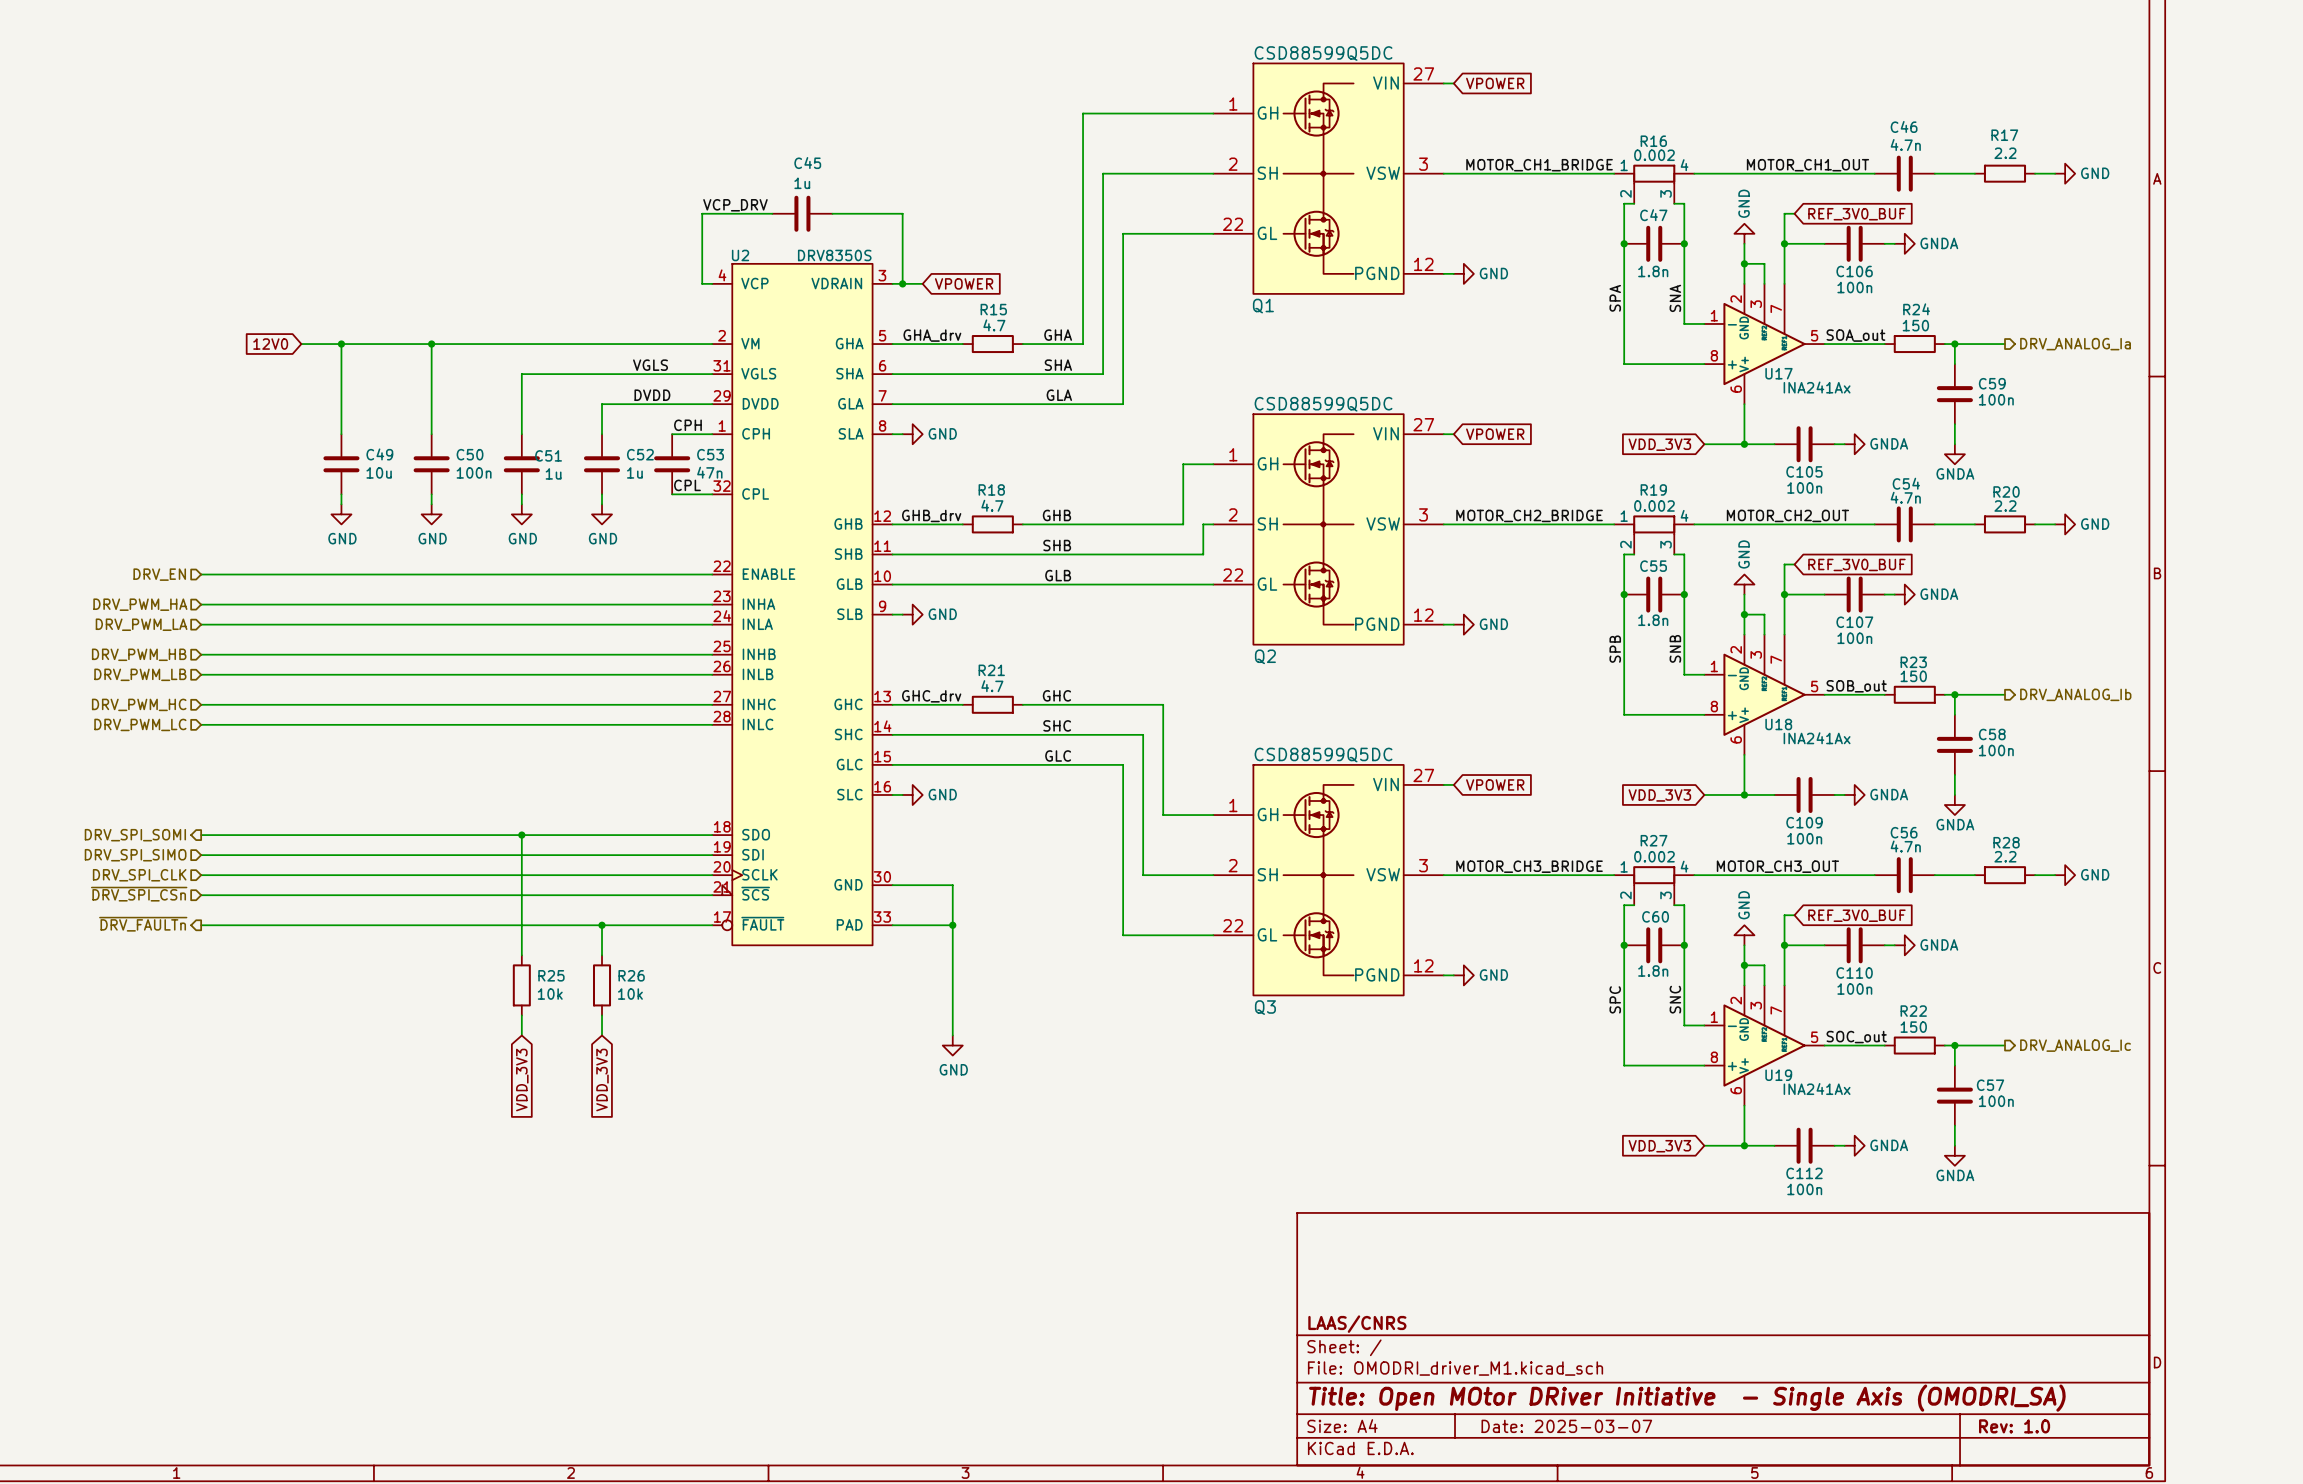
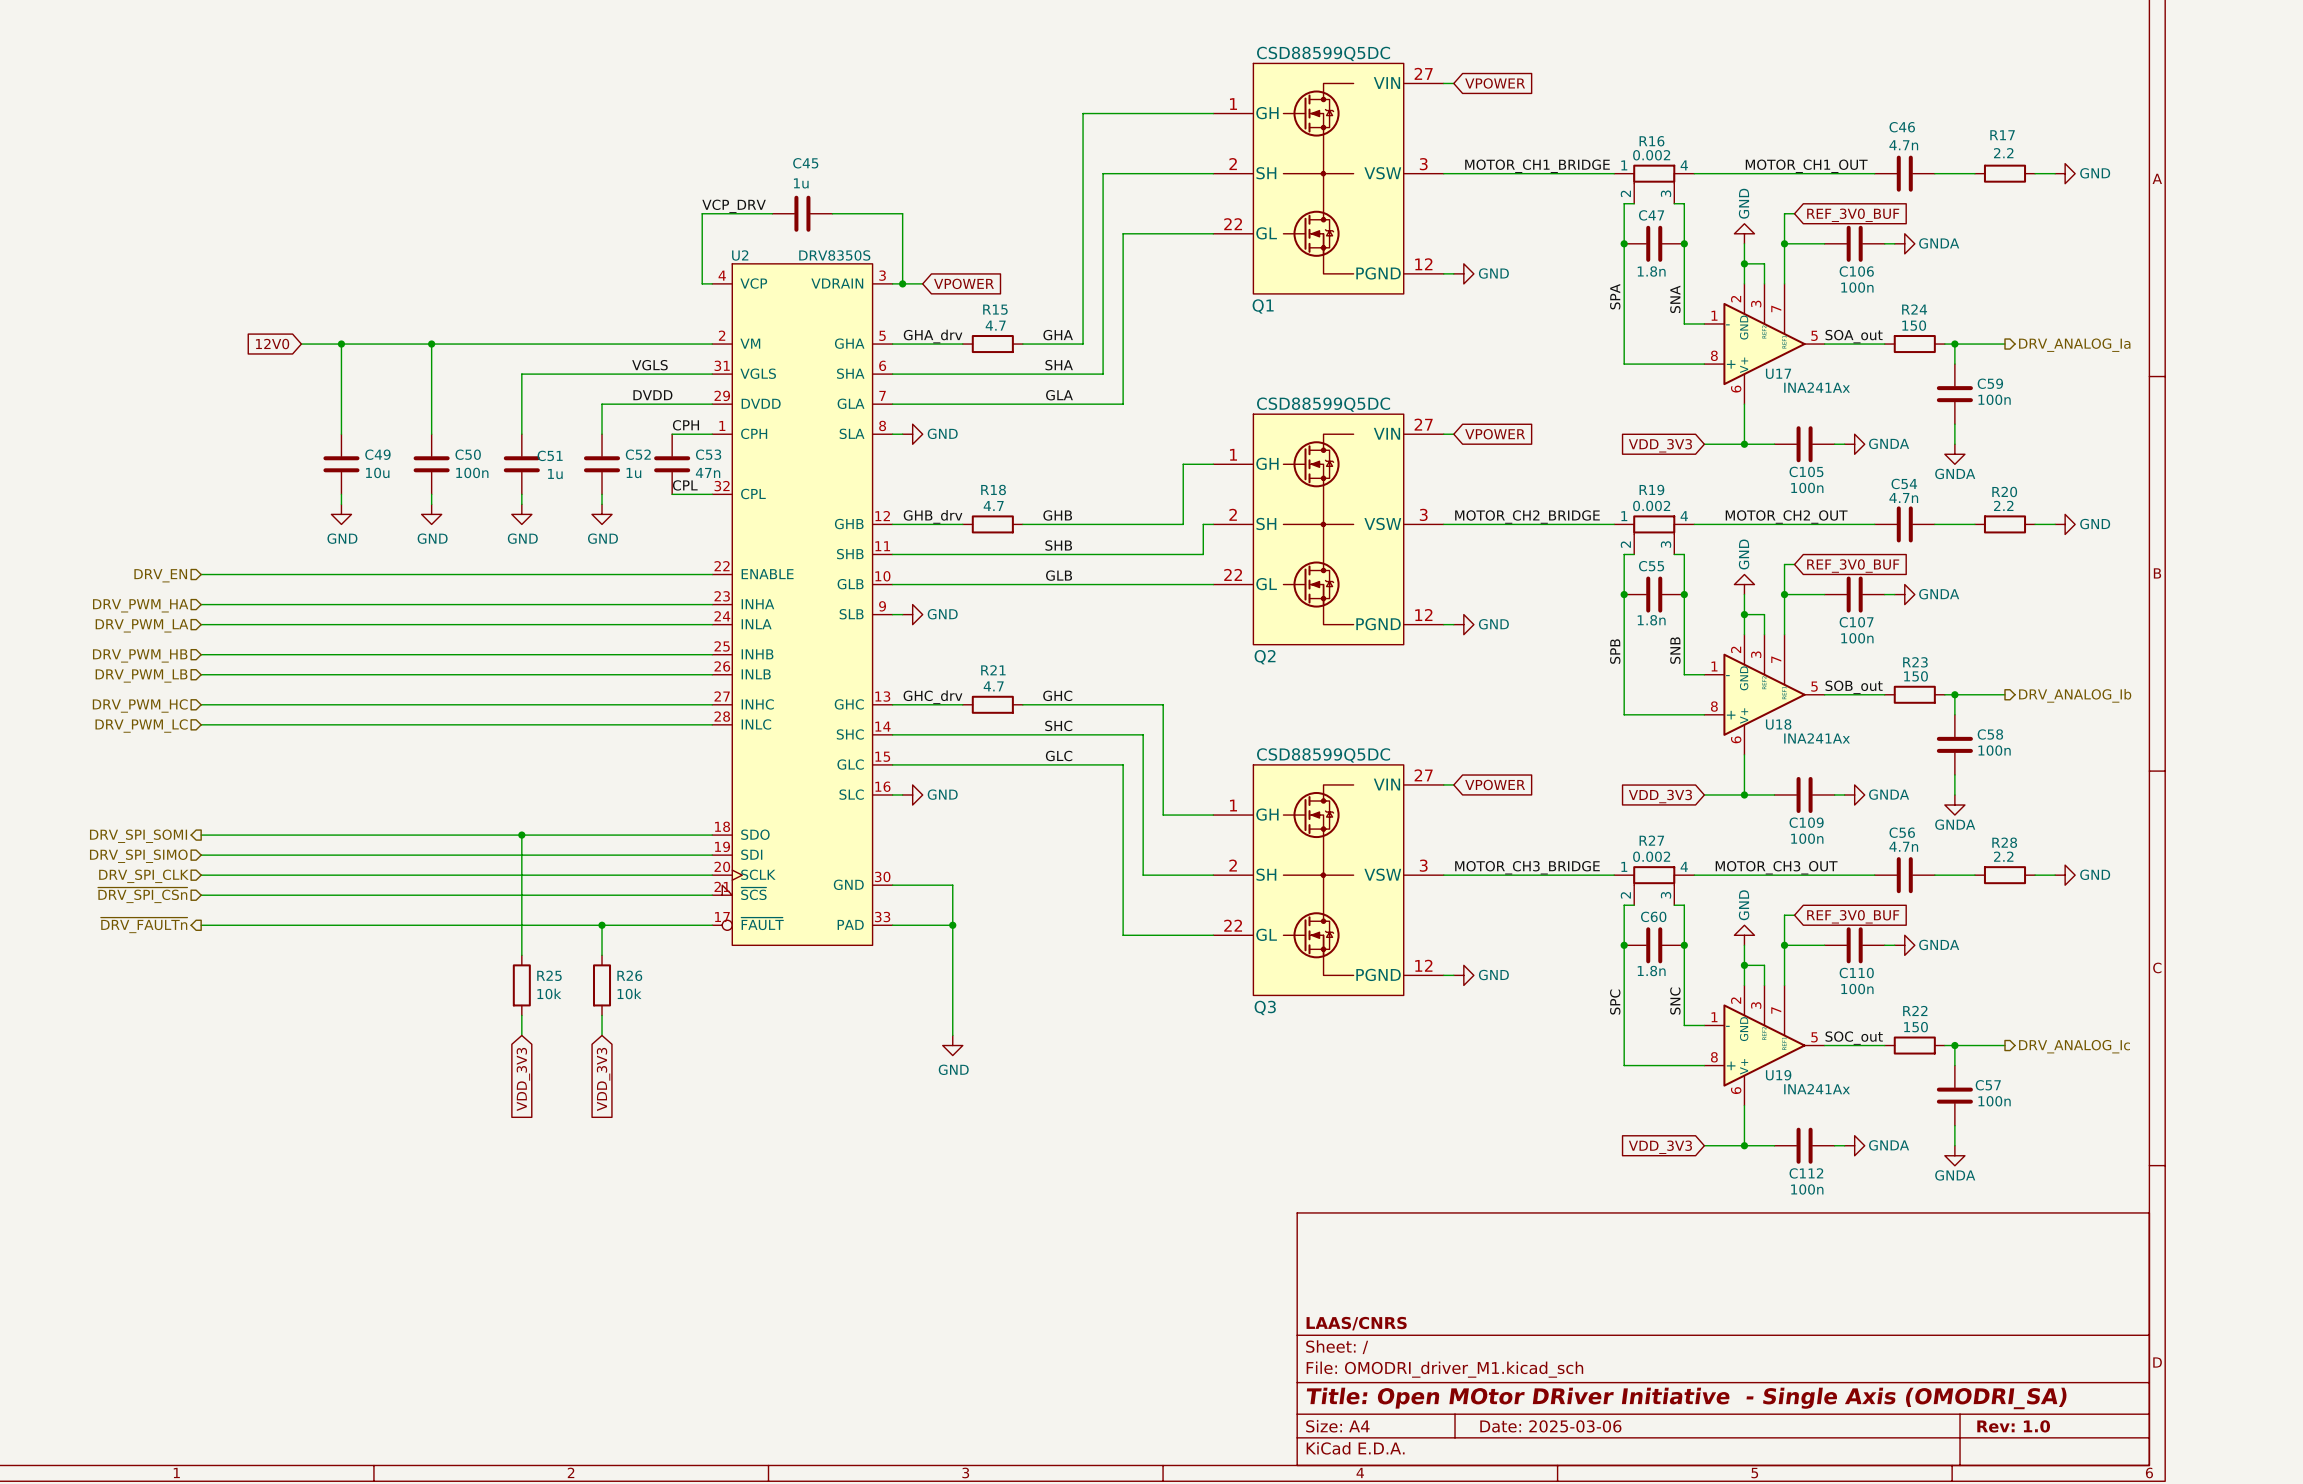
title block: Date: 2025-03-07 (1566, 1426) -> Date: 2025-03-06 (1550, 1426)

